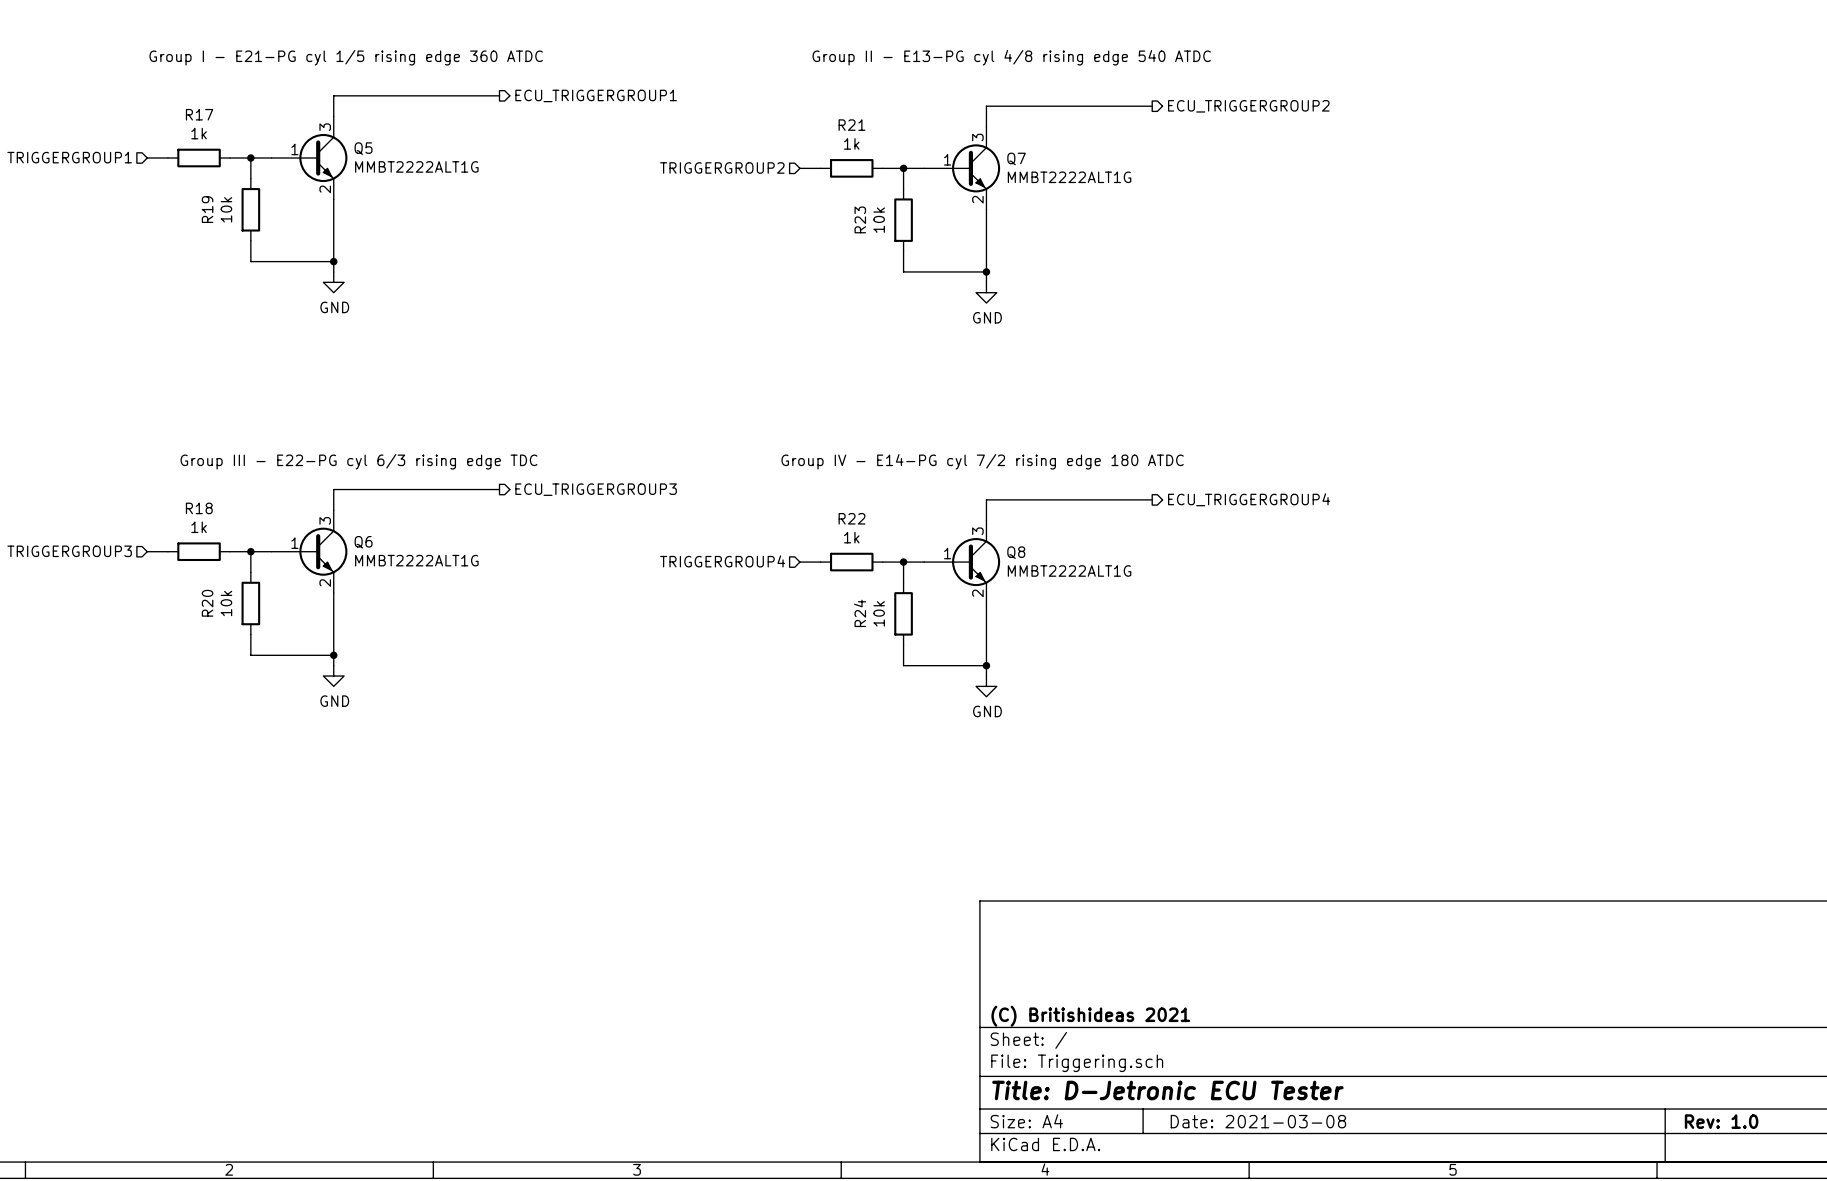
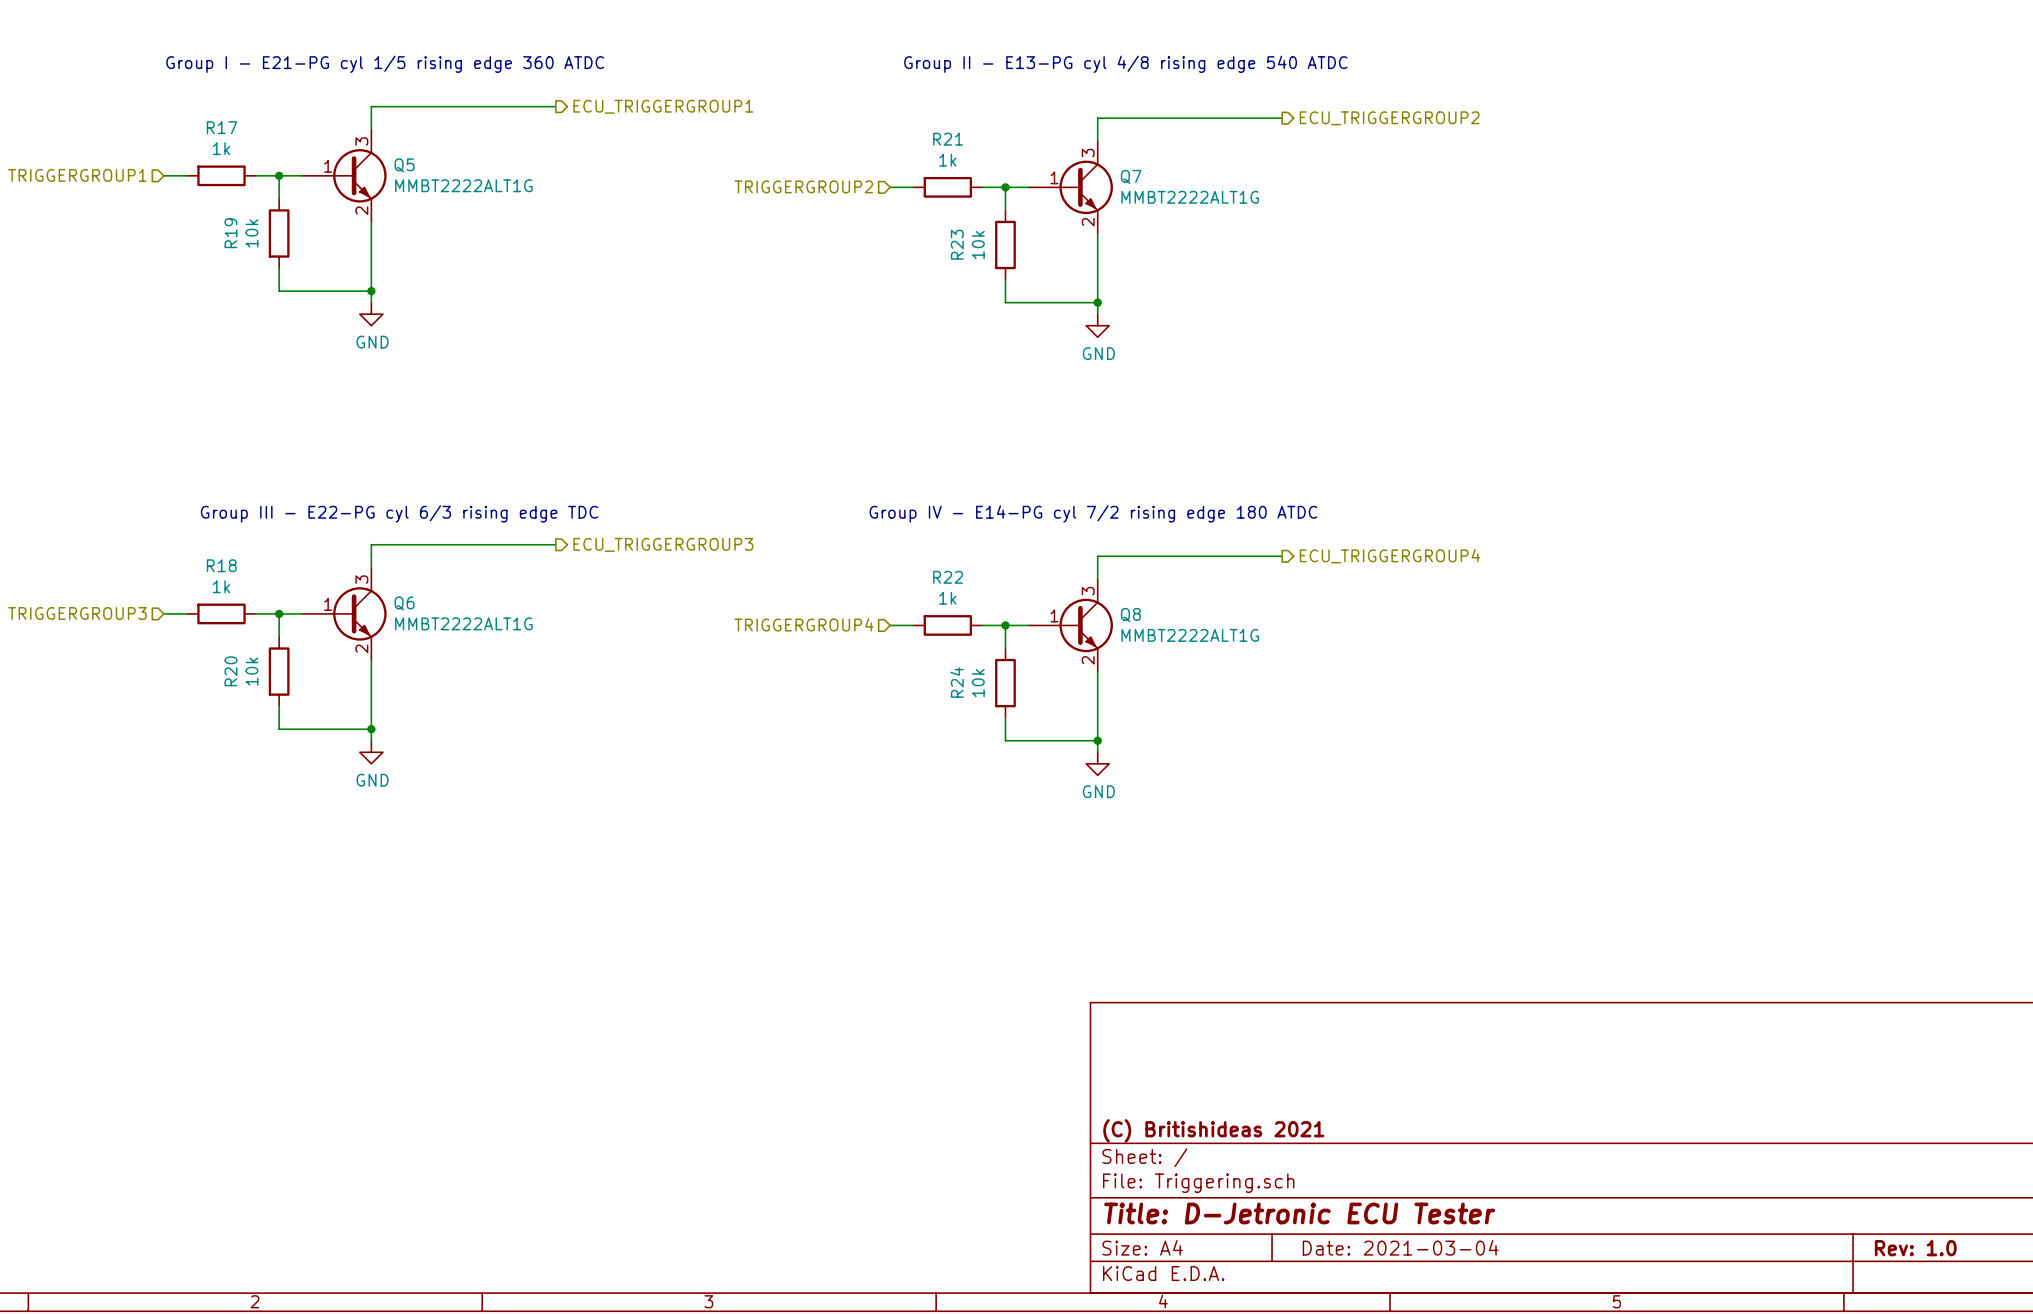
title block: Date: 2021-03-08 (1258, 1121) -> Date: 2021-03-04 (1400, 1247)

